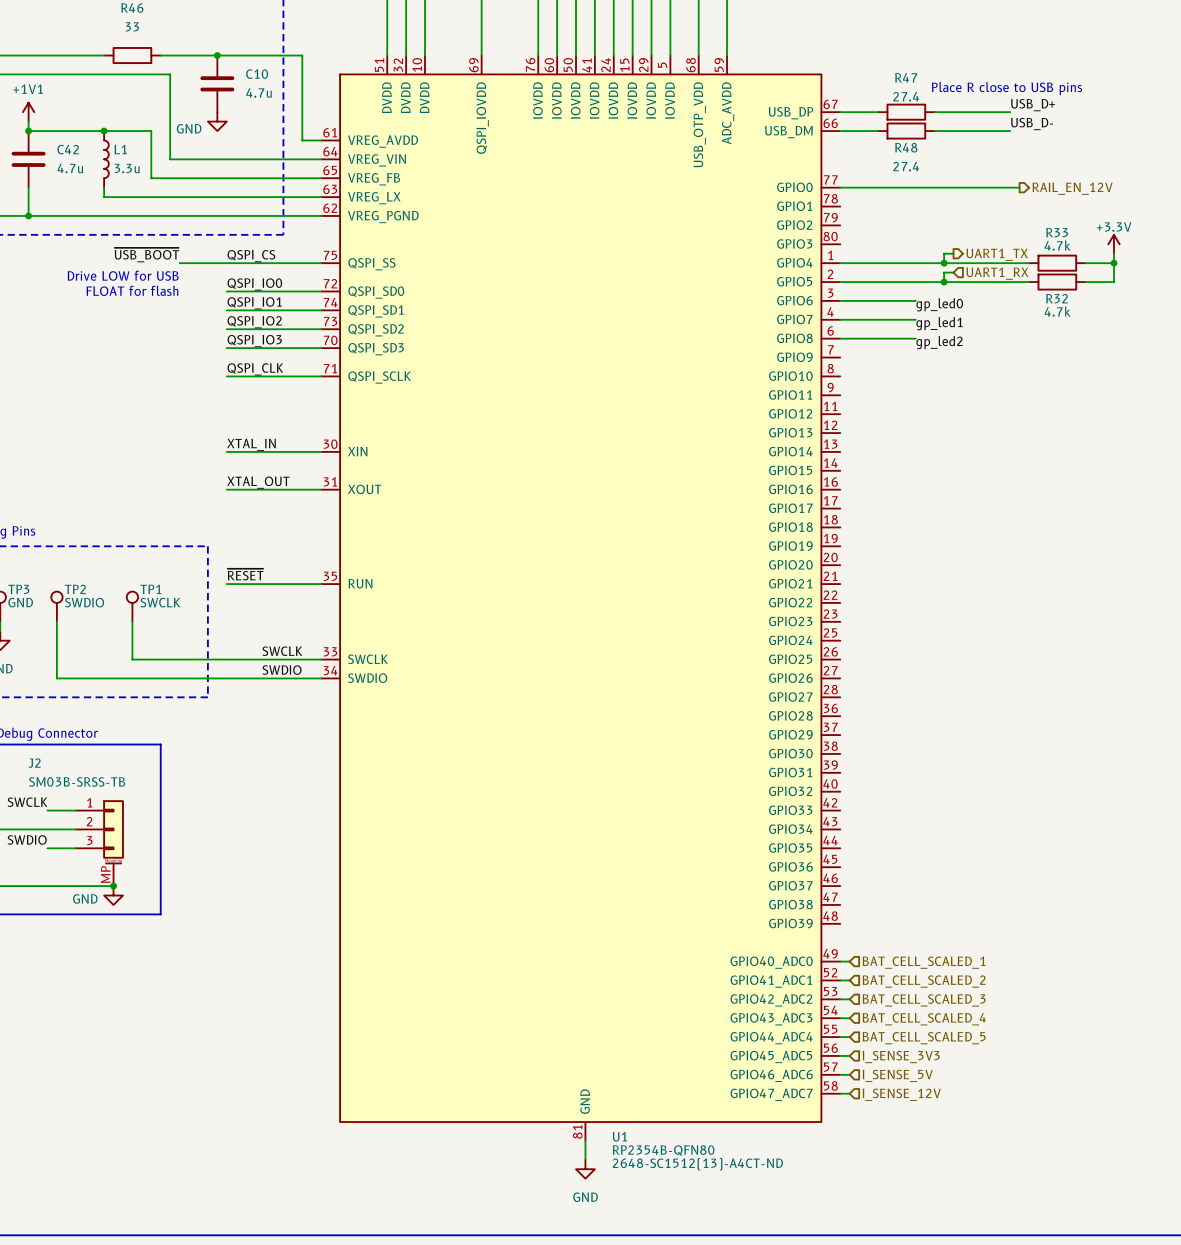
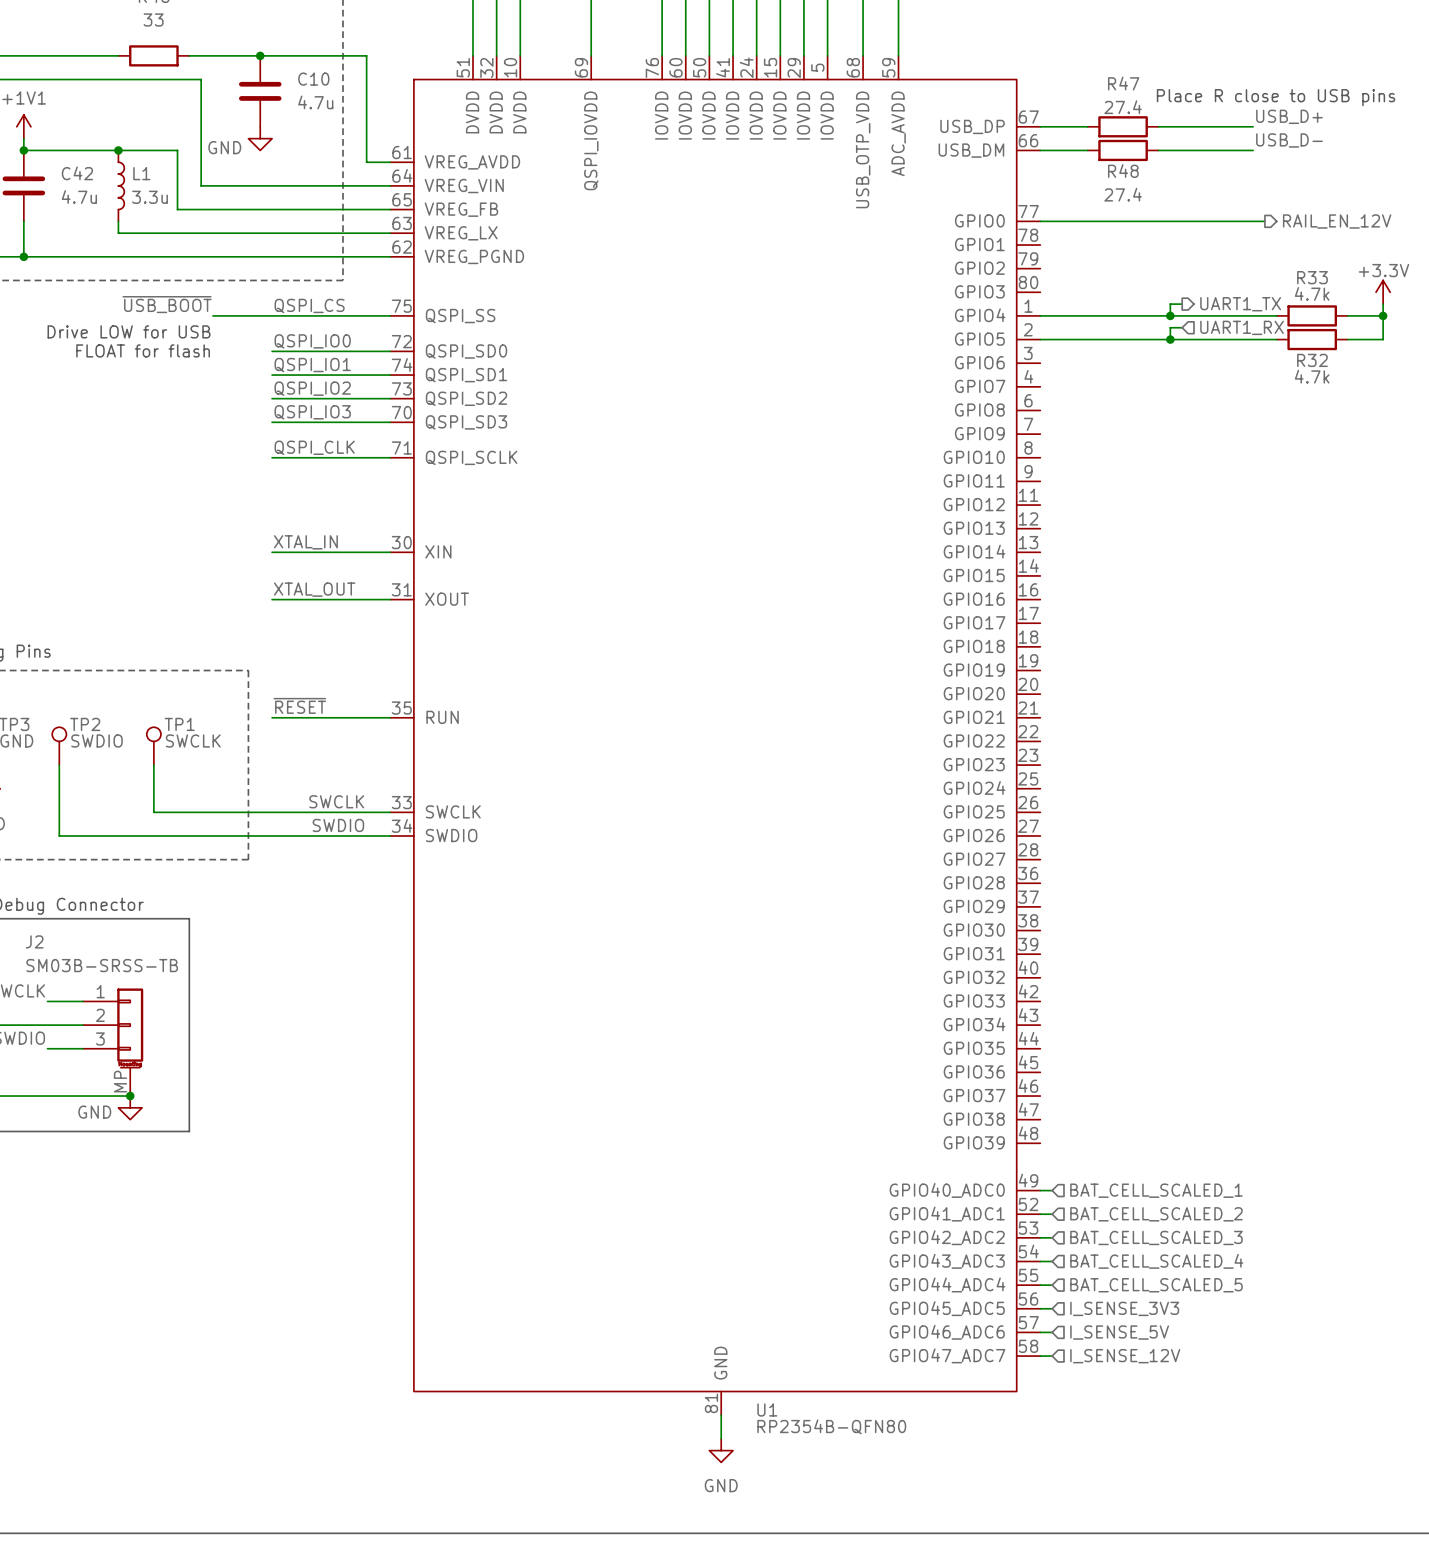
wire: (840, 300) (915, 300) -> none
label: gp_led0 (939, 304) -> none
wire: (840, 319) (915, 319) -> none
label: gp_led1 (939, 323) -> none
wire: (840, 338) (915, 338) -> none
label: gp_led2 (939, 342) -> none
U1 text: 2648-SC1512(13)-A4CT-ND (697, 1164) -> none

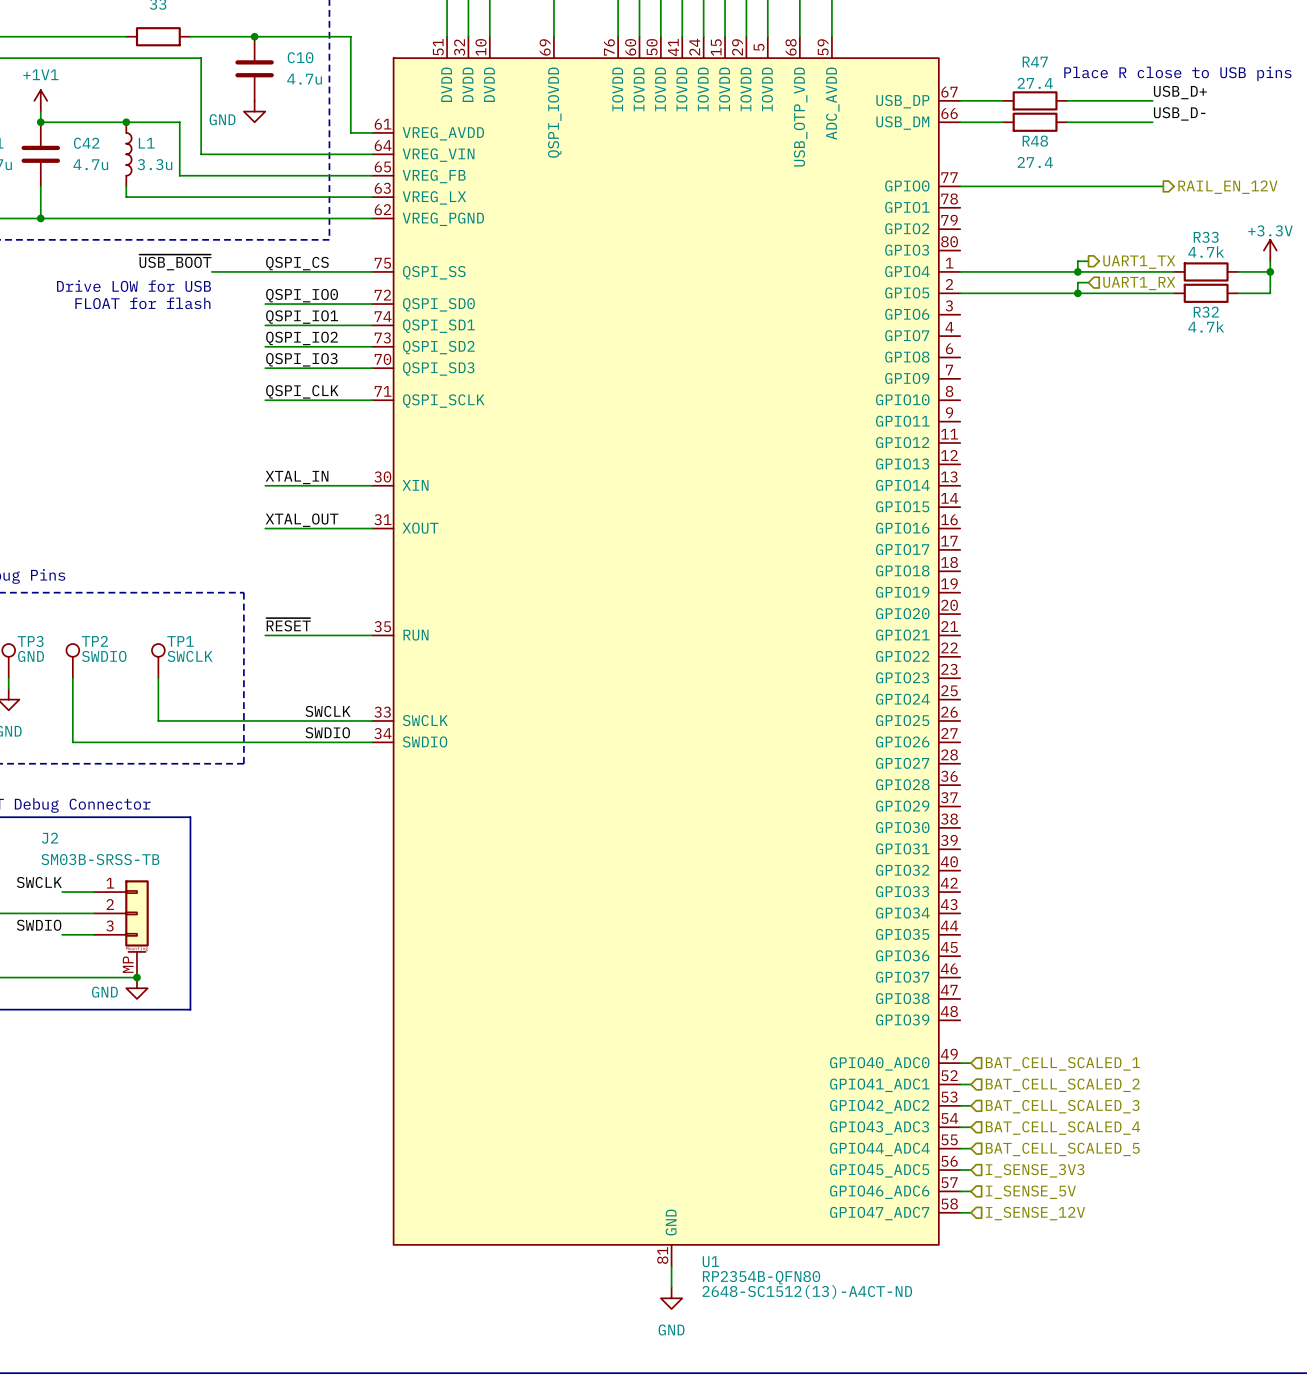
U1 text: none -> 2648-SC1512(13)-A4CT-ND (807, 1292)

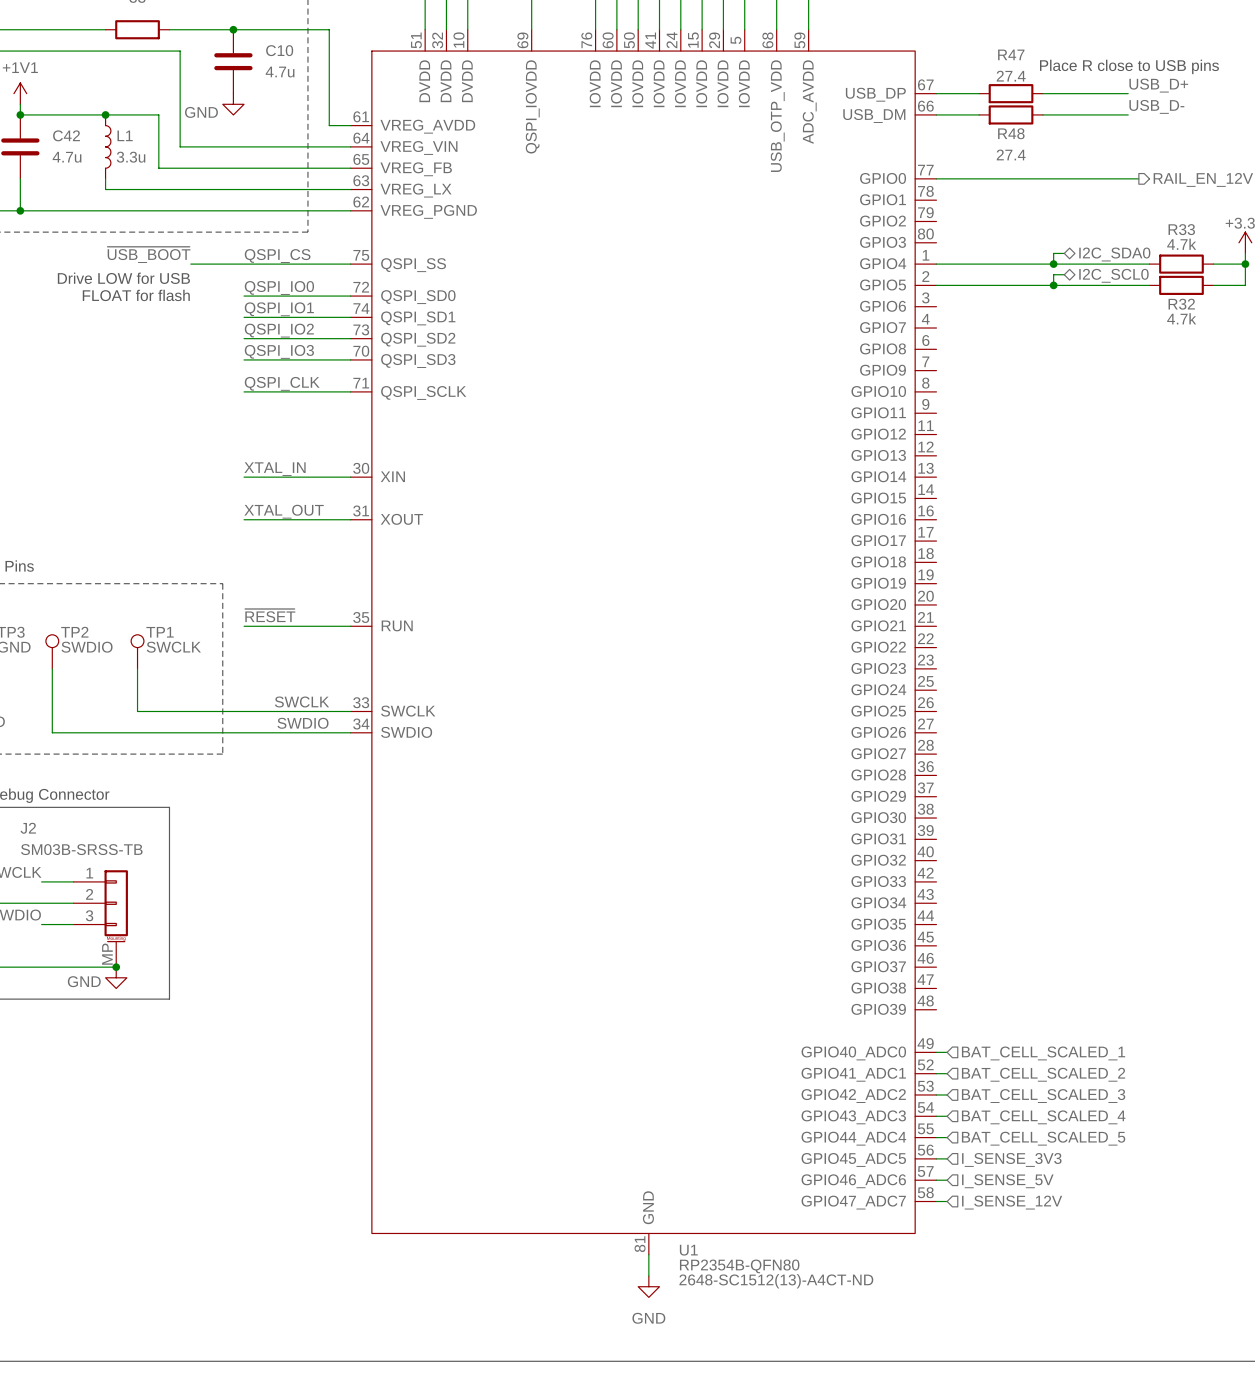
hierarchical label shape: output (1139, 262) -> bidirectional (1114, 254)
hierarchical label: UART1_TX (1139, 262) -> I2C_SDA0 (1114, 254)
hierarchical label shape: input (1139, 283) -> bidirectional (1113, 275)
hierarchical label: UART1_RX (1139, 283) -> I2C_SCL0 (1113, 275)

